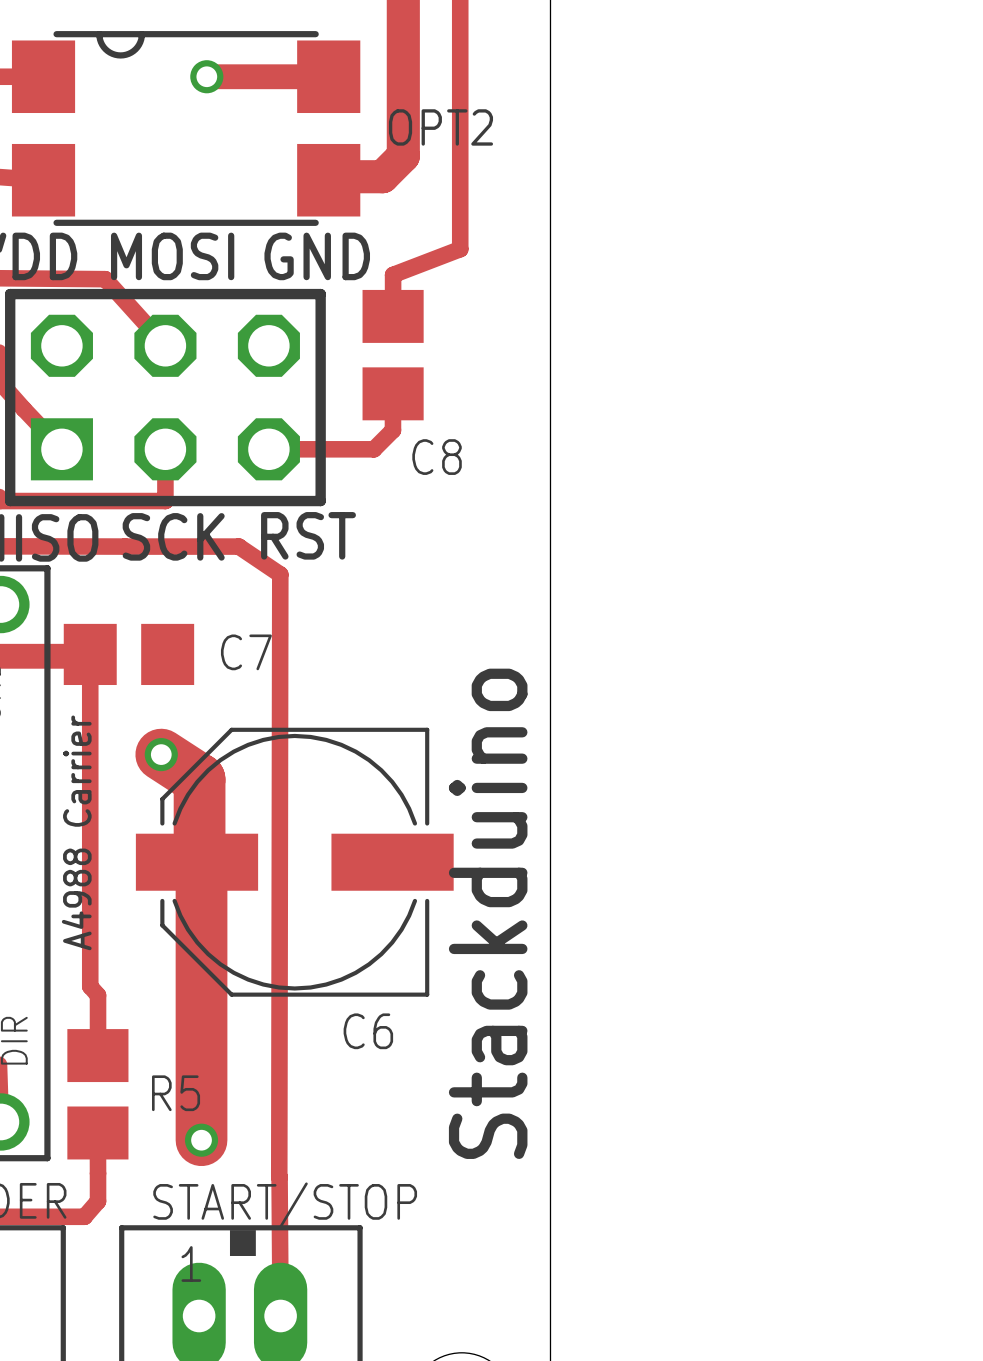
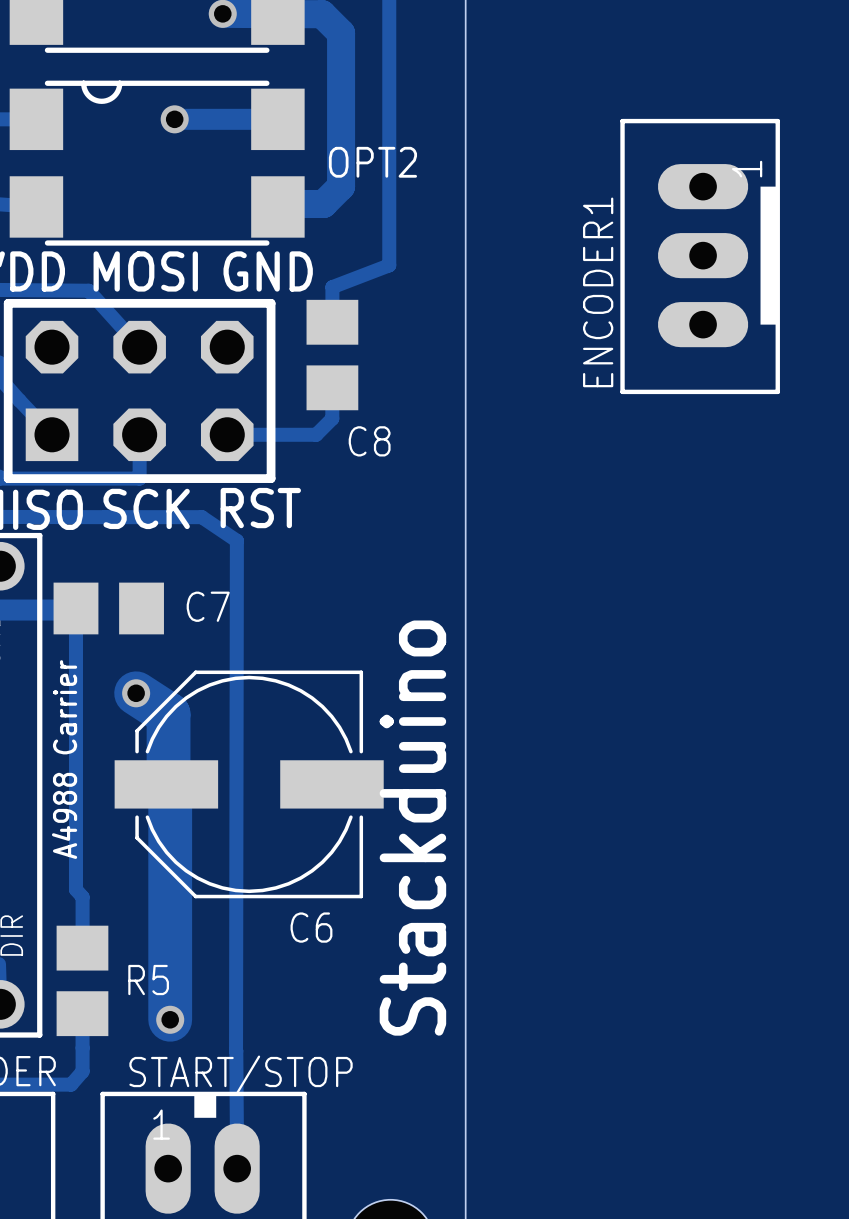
ENCODER1: none -> (700, 256)

